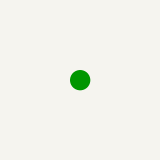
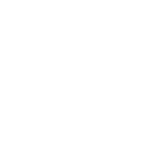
junction: (80, 80) -> none

